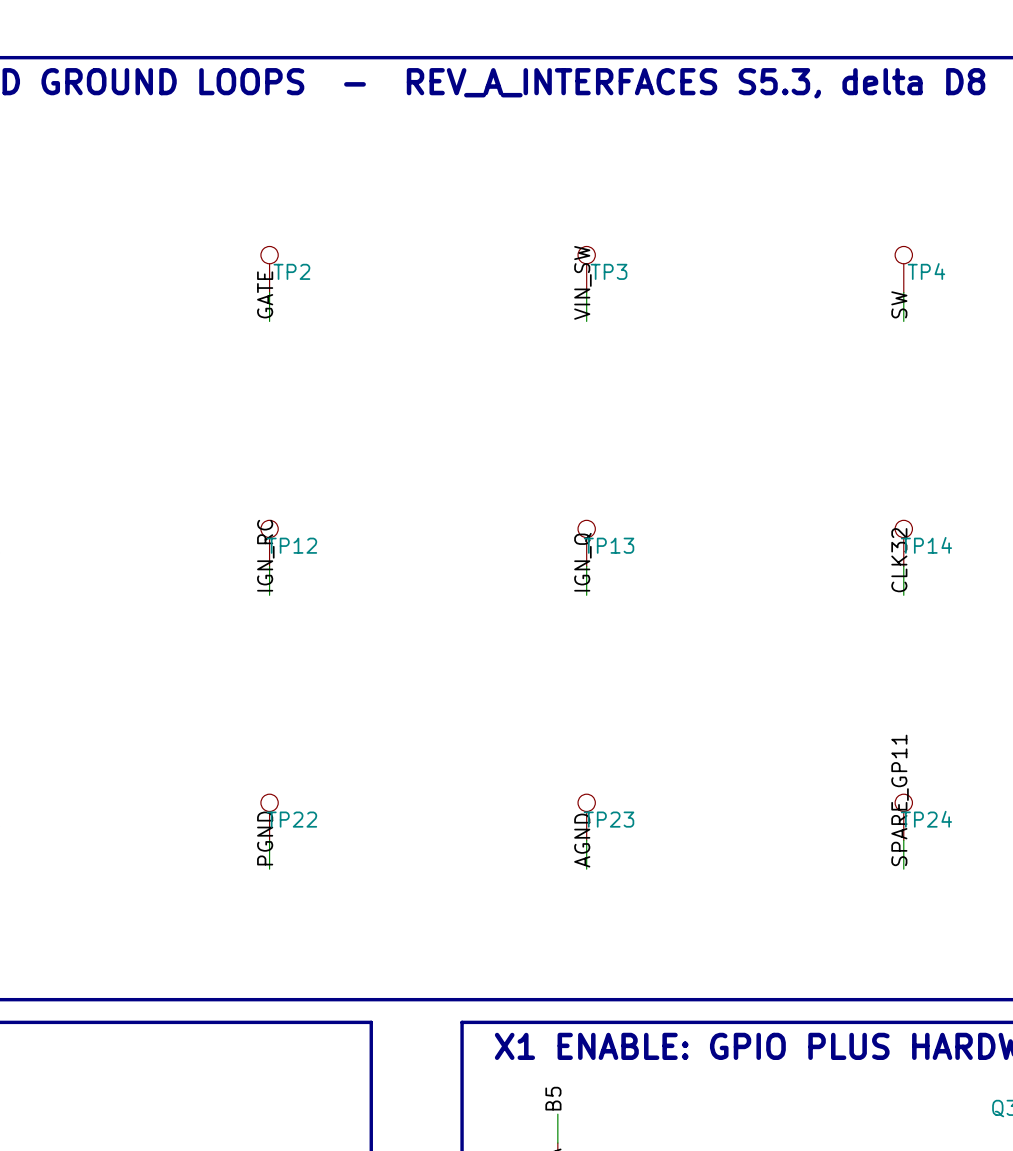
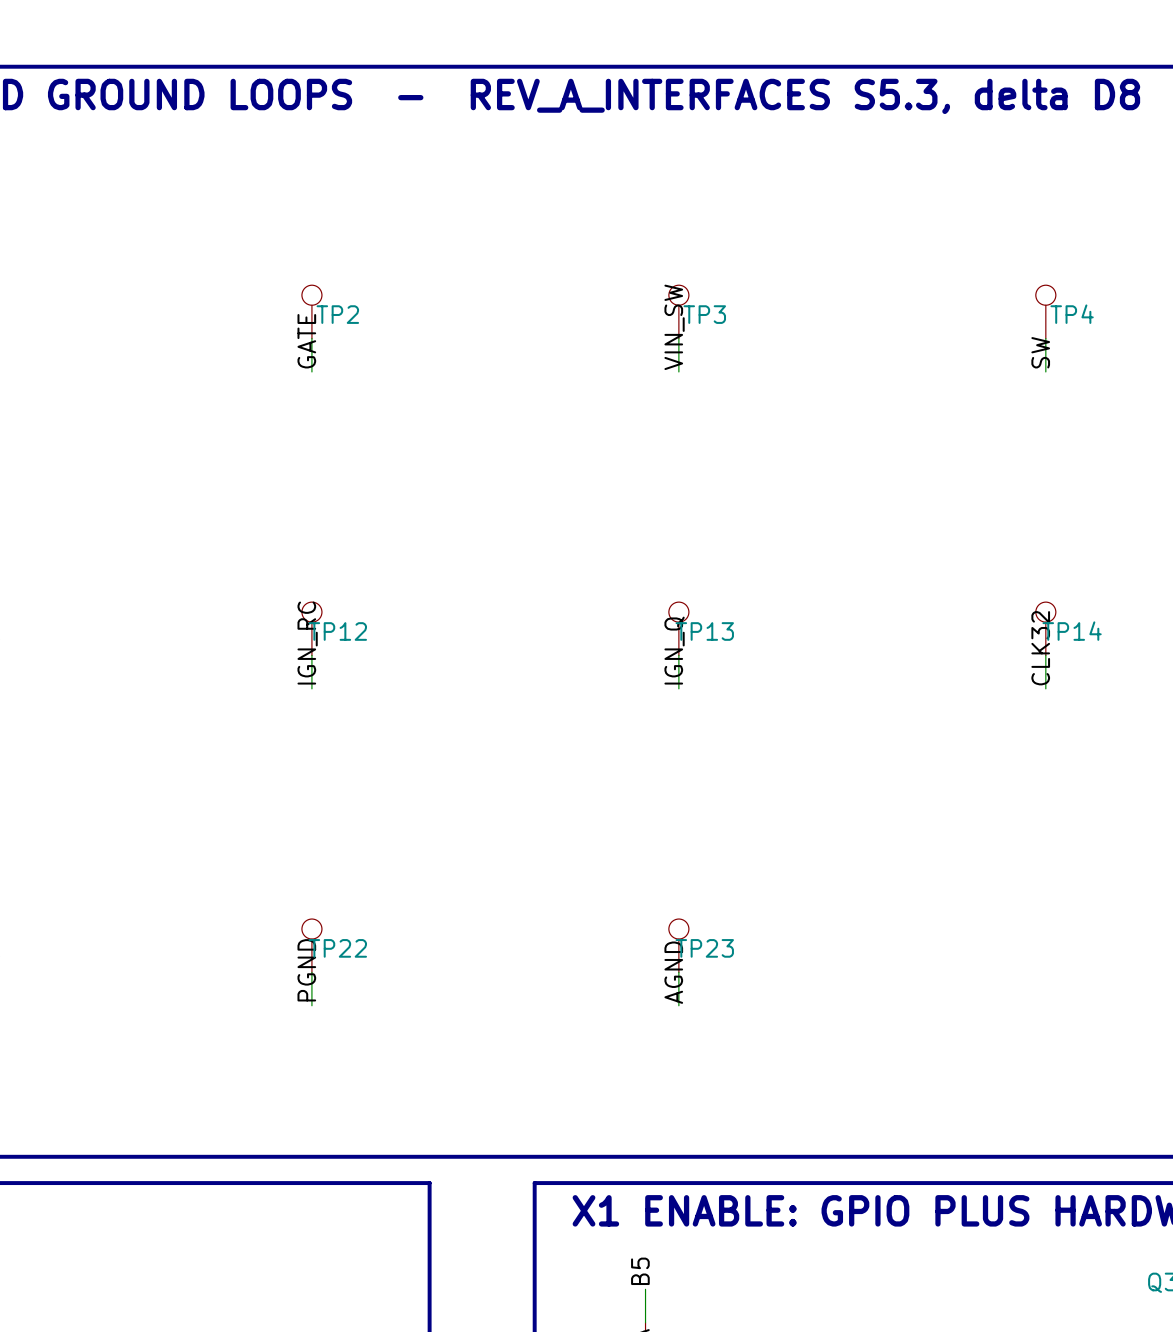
label: SPARE_GP11 (900, 800) -> none
TP24: (903, 817) -> none
wire: (903, 840) (903, 869) -> none

